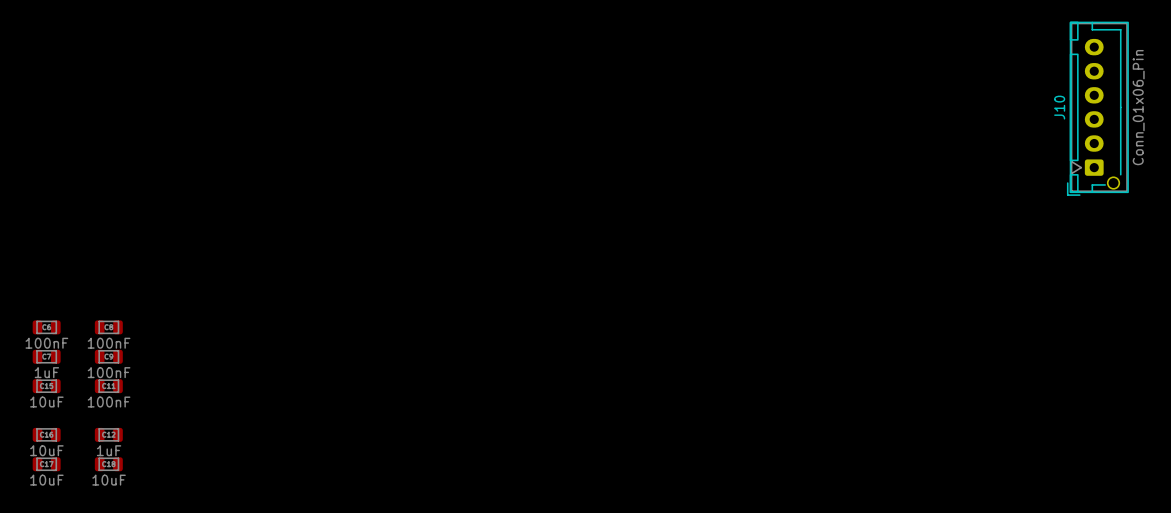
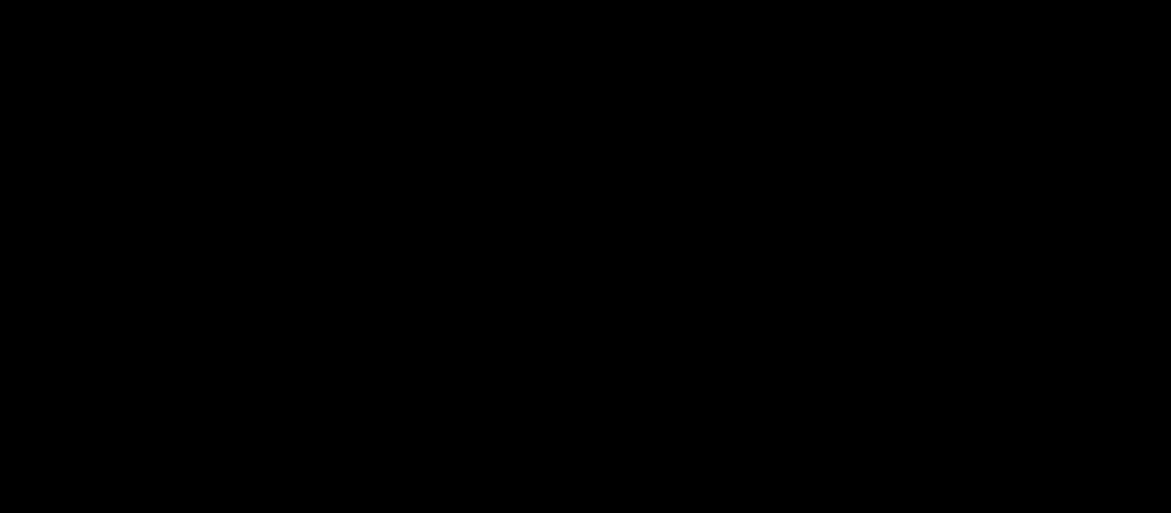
J10: Conn_01x06_Pin (1097, 108) -> none
part: 100nF (46, 327) -> none
part: 100nF (108, 327) -> none
part: 1uF (46, 356) -> none
part: 100nF (108, 356) -> none
part: 10uF (46, 386) -> none
part: 100nF (108, 386) -> none
part: 10uF (46, 434) -> none
part: 1uF (108, 434) -> none
part: 10uF (46, 464) -> none
part: 10uF (108, 464) -> none

